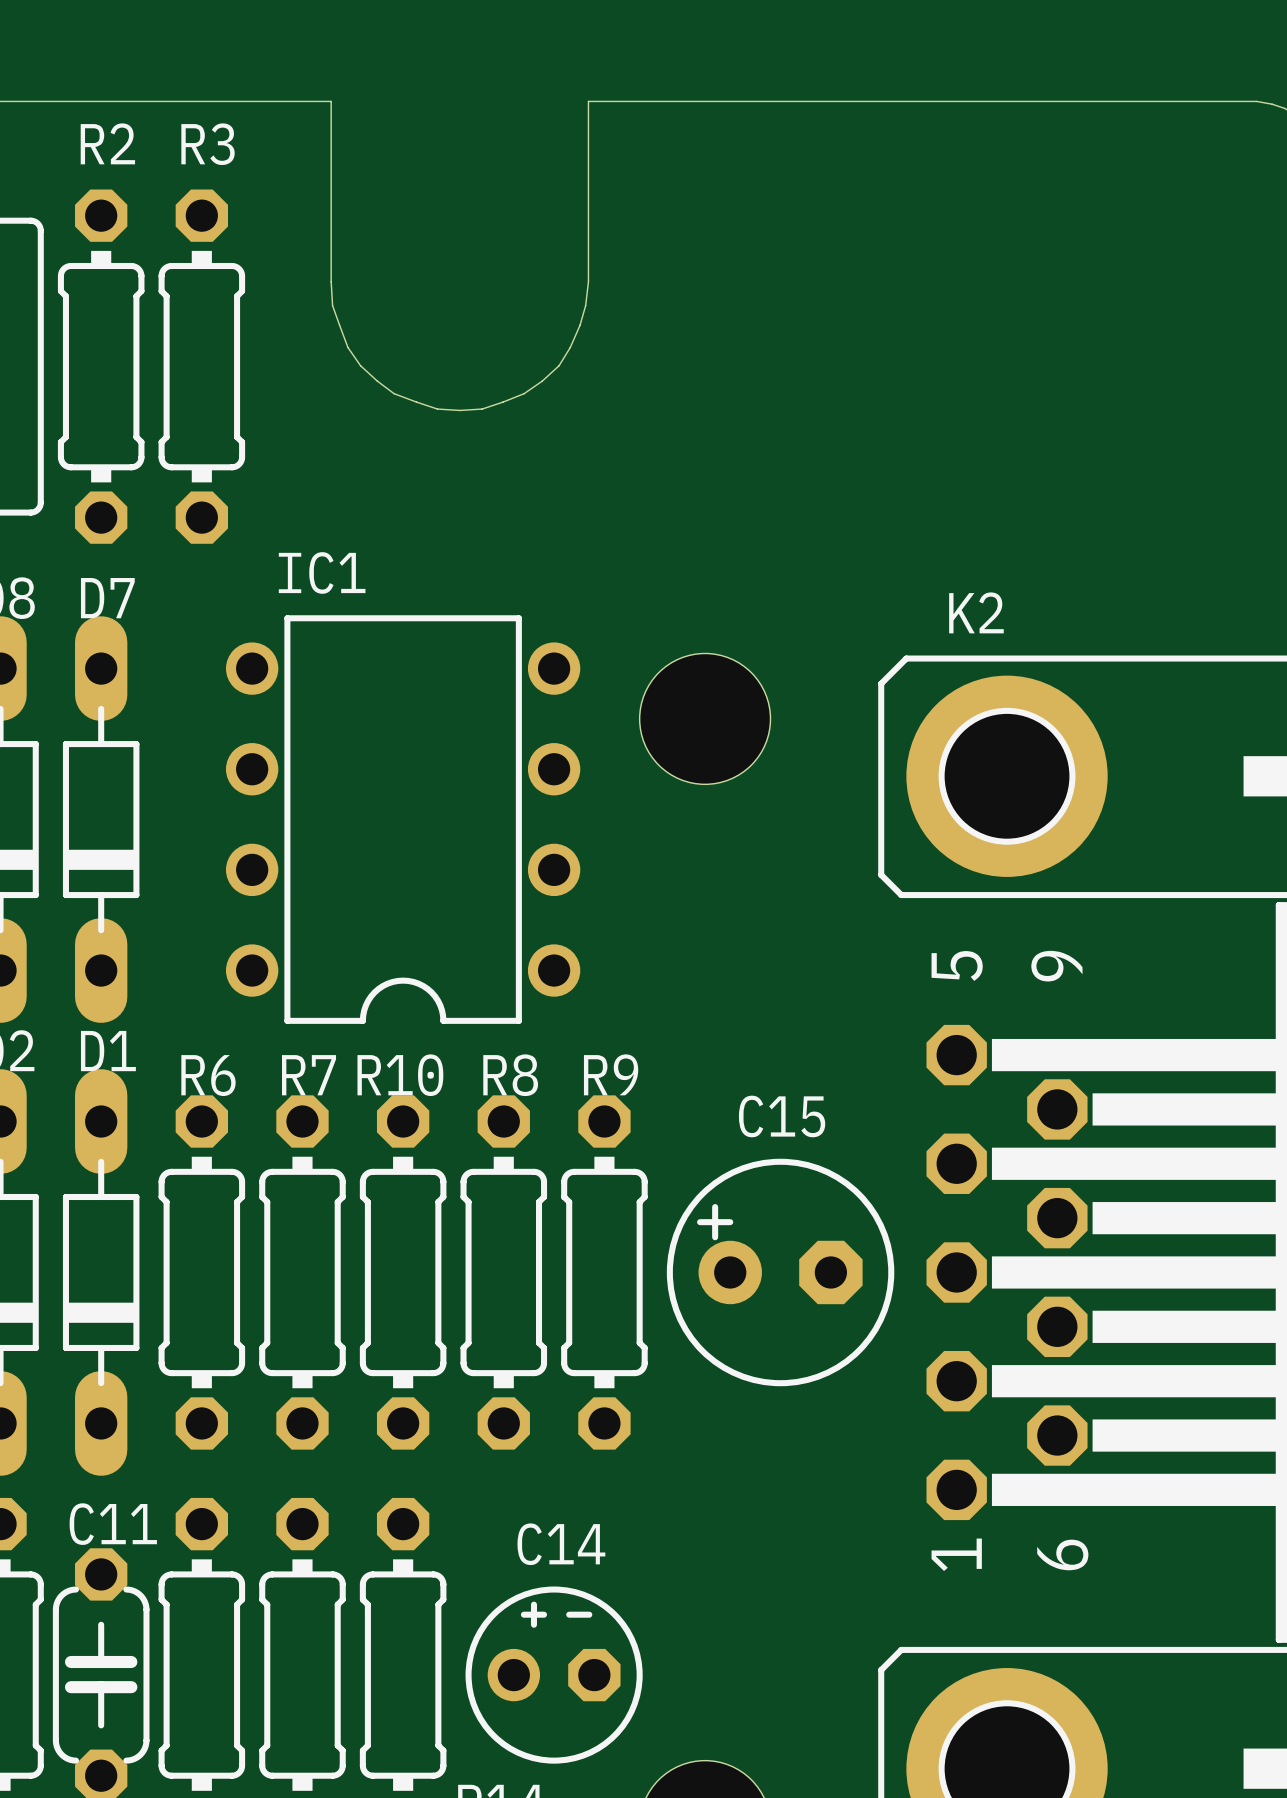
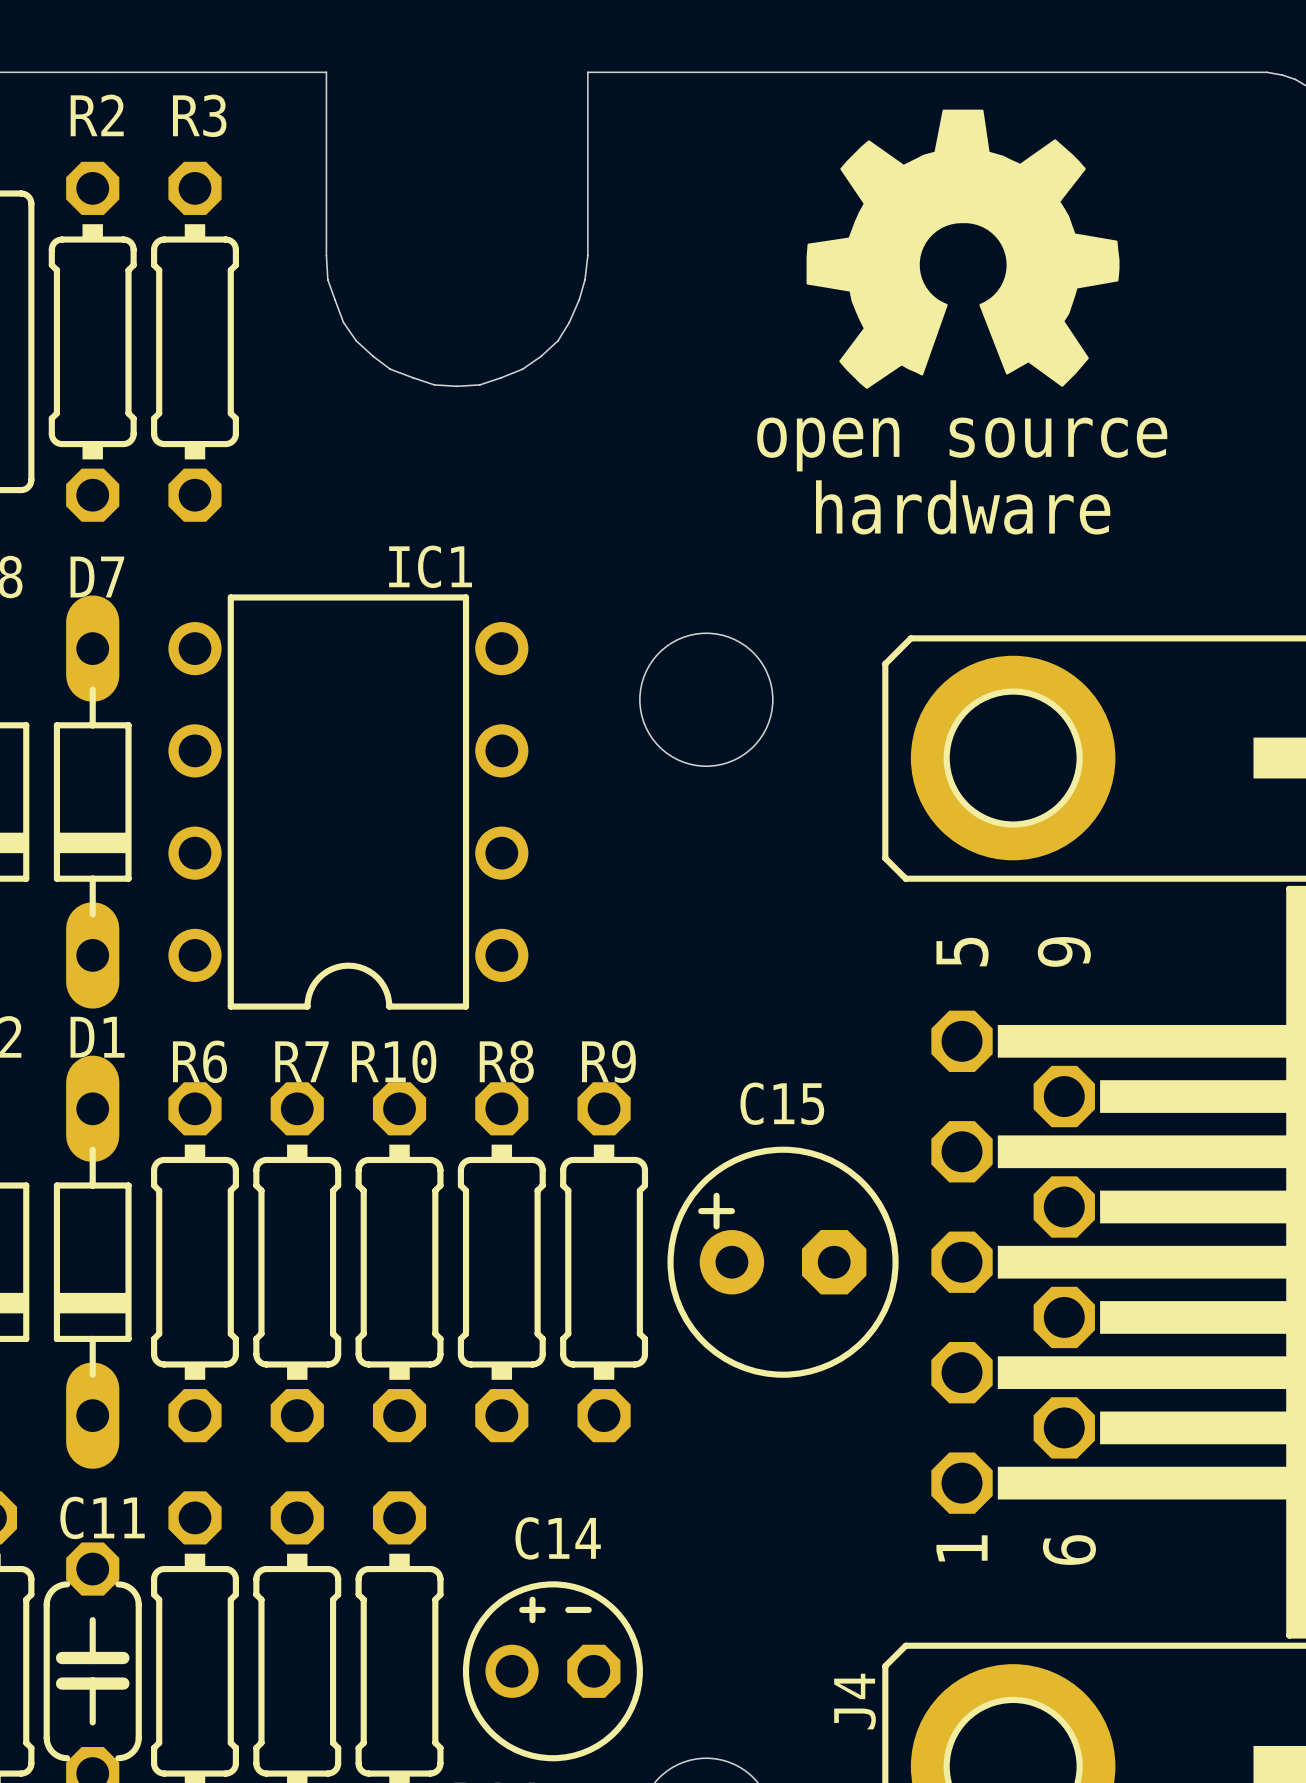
drawing: none -> [806, 109, 1120, 389]
IC1 name position: IC1 (322, 572) -> IC1 (430, 566)
K2 name: K2 (976, 612) -> J4 (855, 1701)
IC1 position: (403, 819) -> (348, 802)

